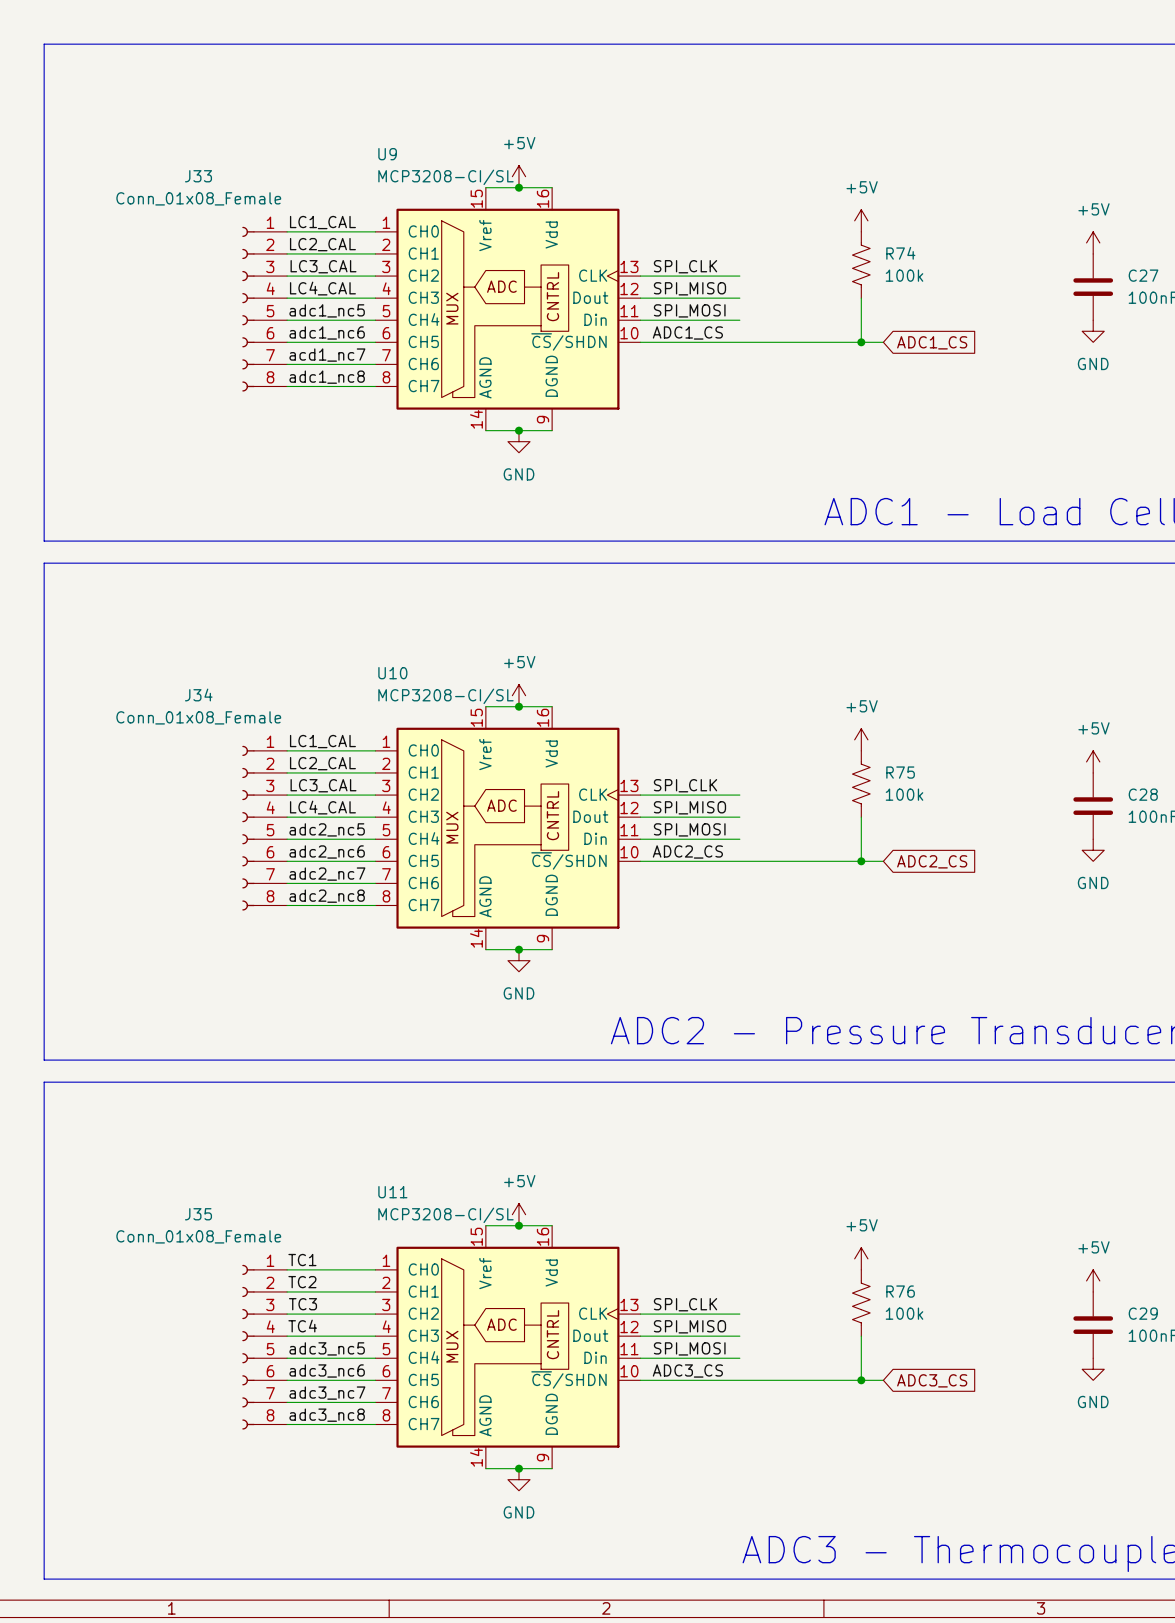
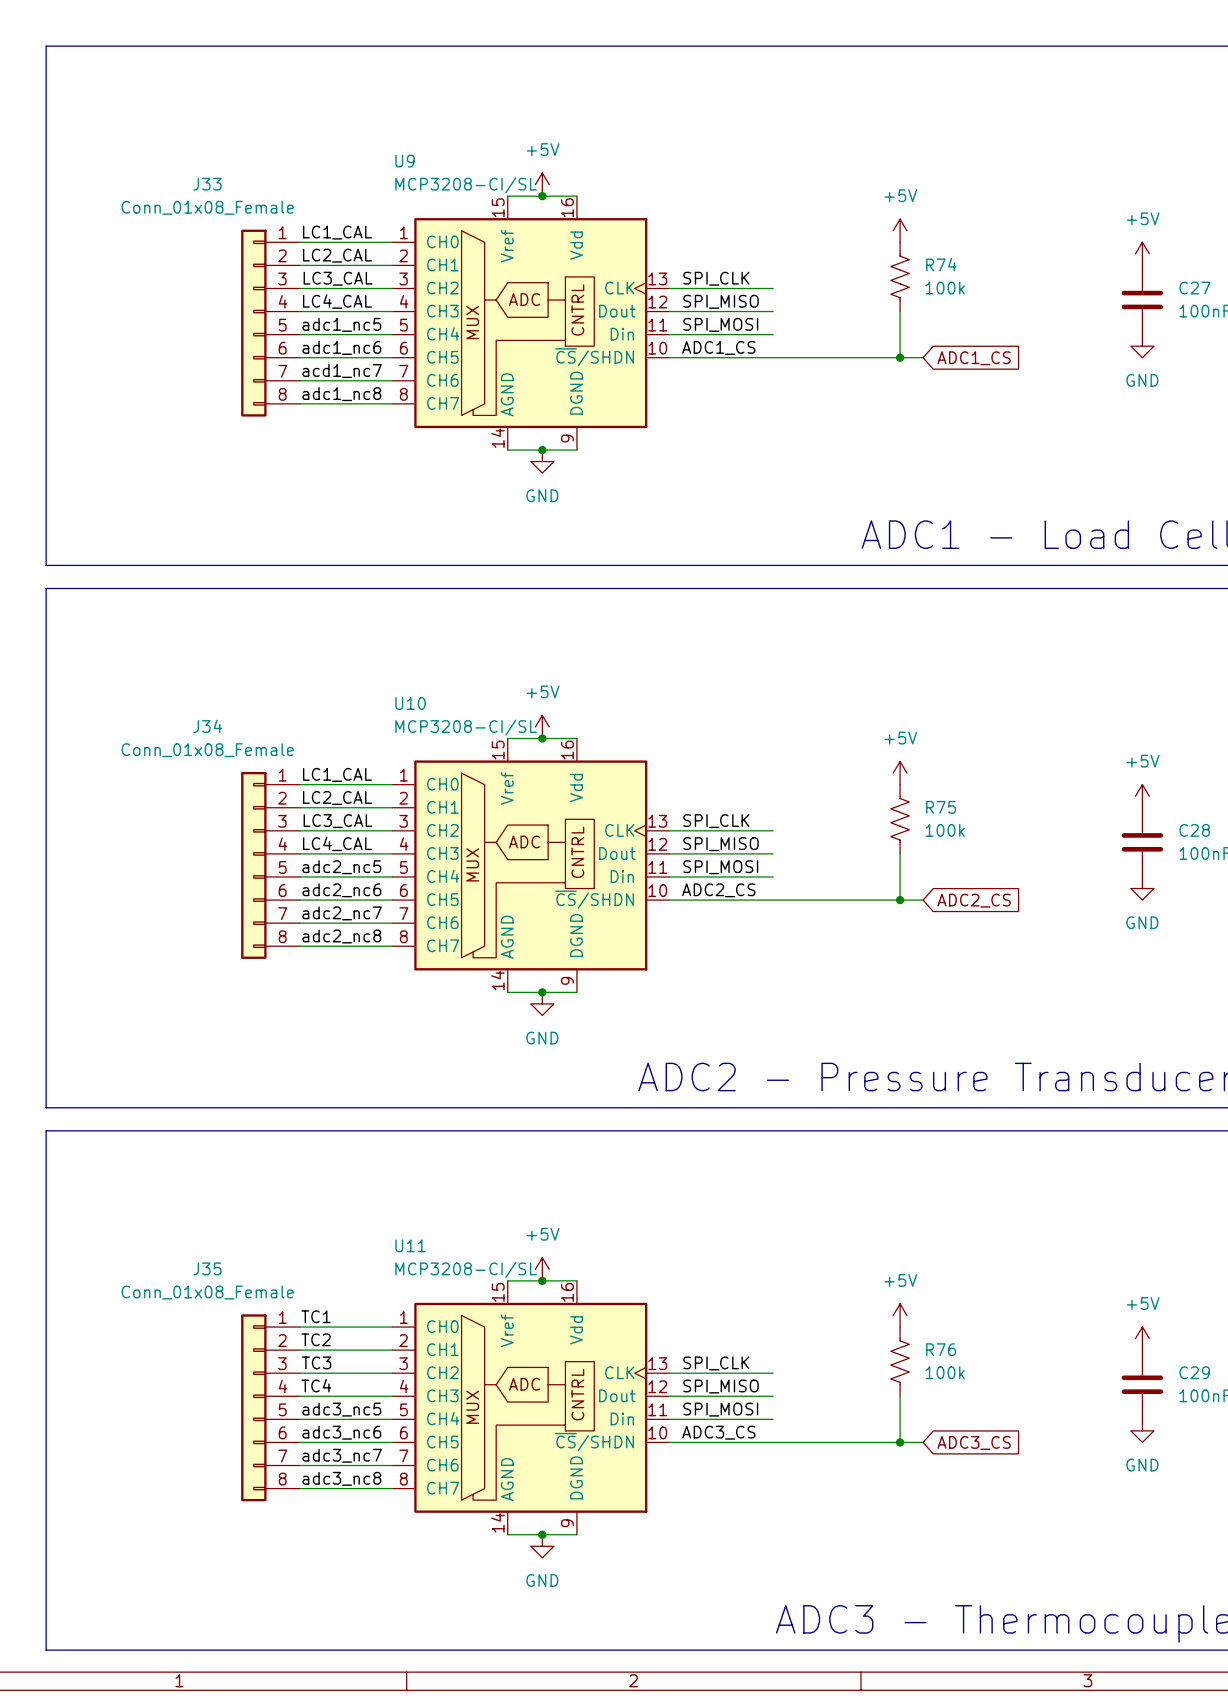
J33 symbol: [242, 226, 288, 392] -> [241, 229, 301, 417]
J34 symbol: [242, 745, 288, 911] -> [241, 771, 301, 959]
J35 symbol: [242, 1264, 288, 1430] -> [241, 1314, 301, 1502]

